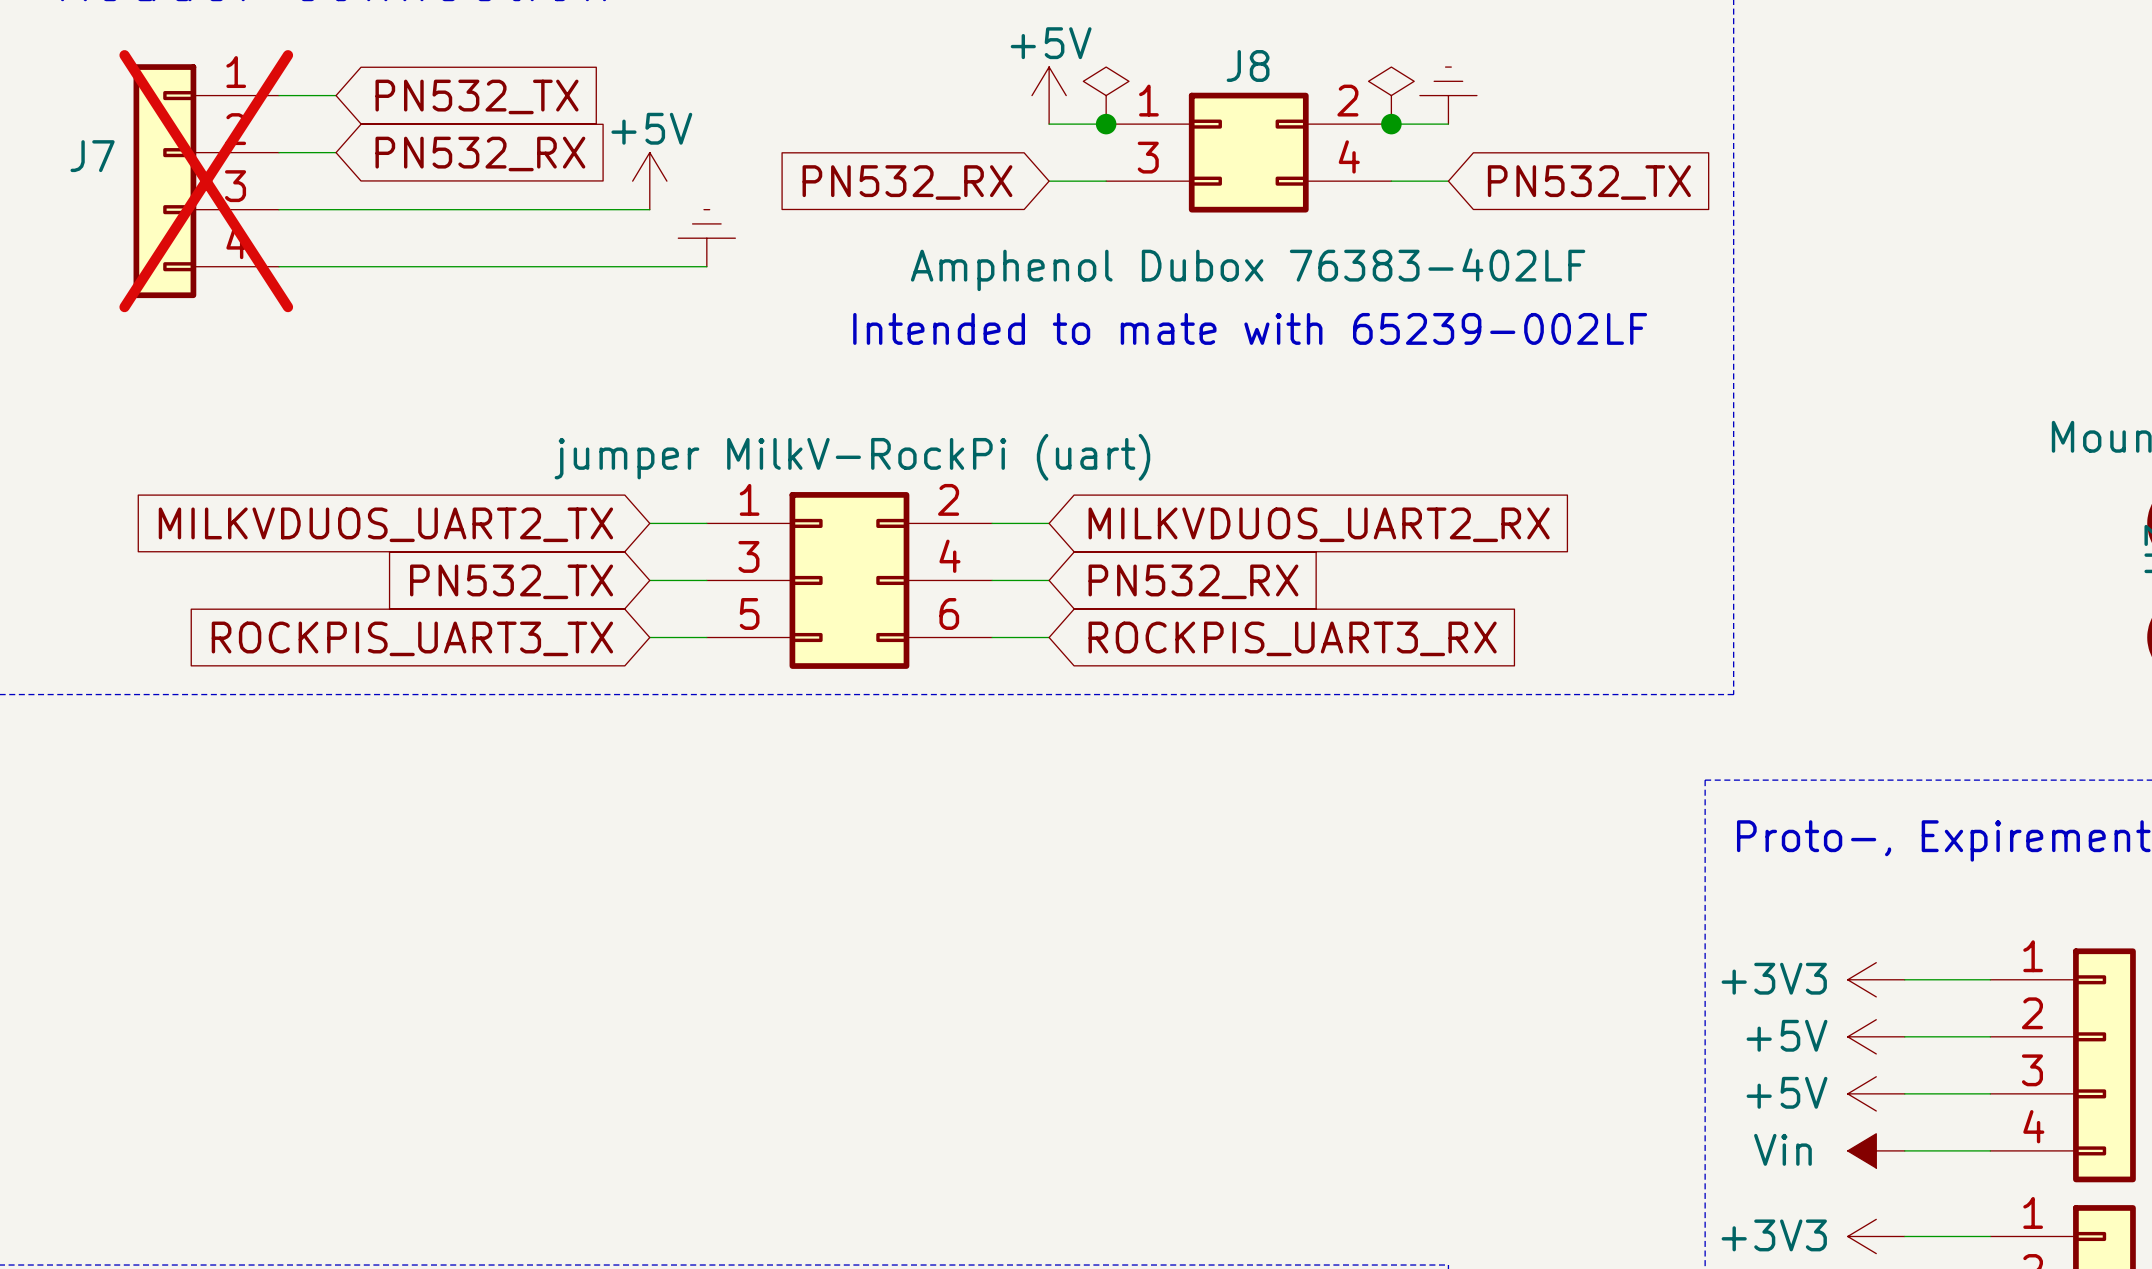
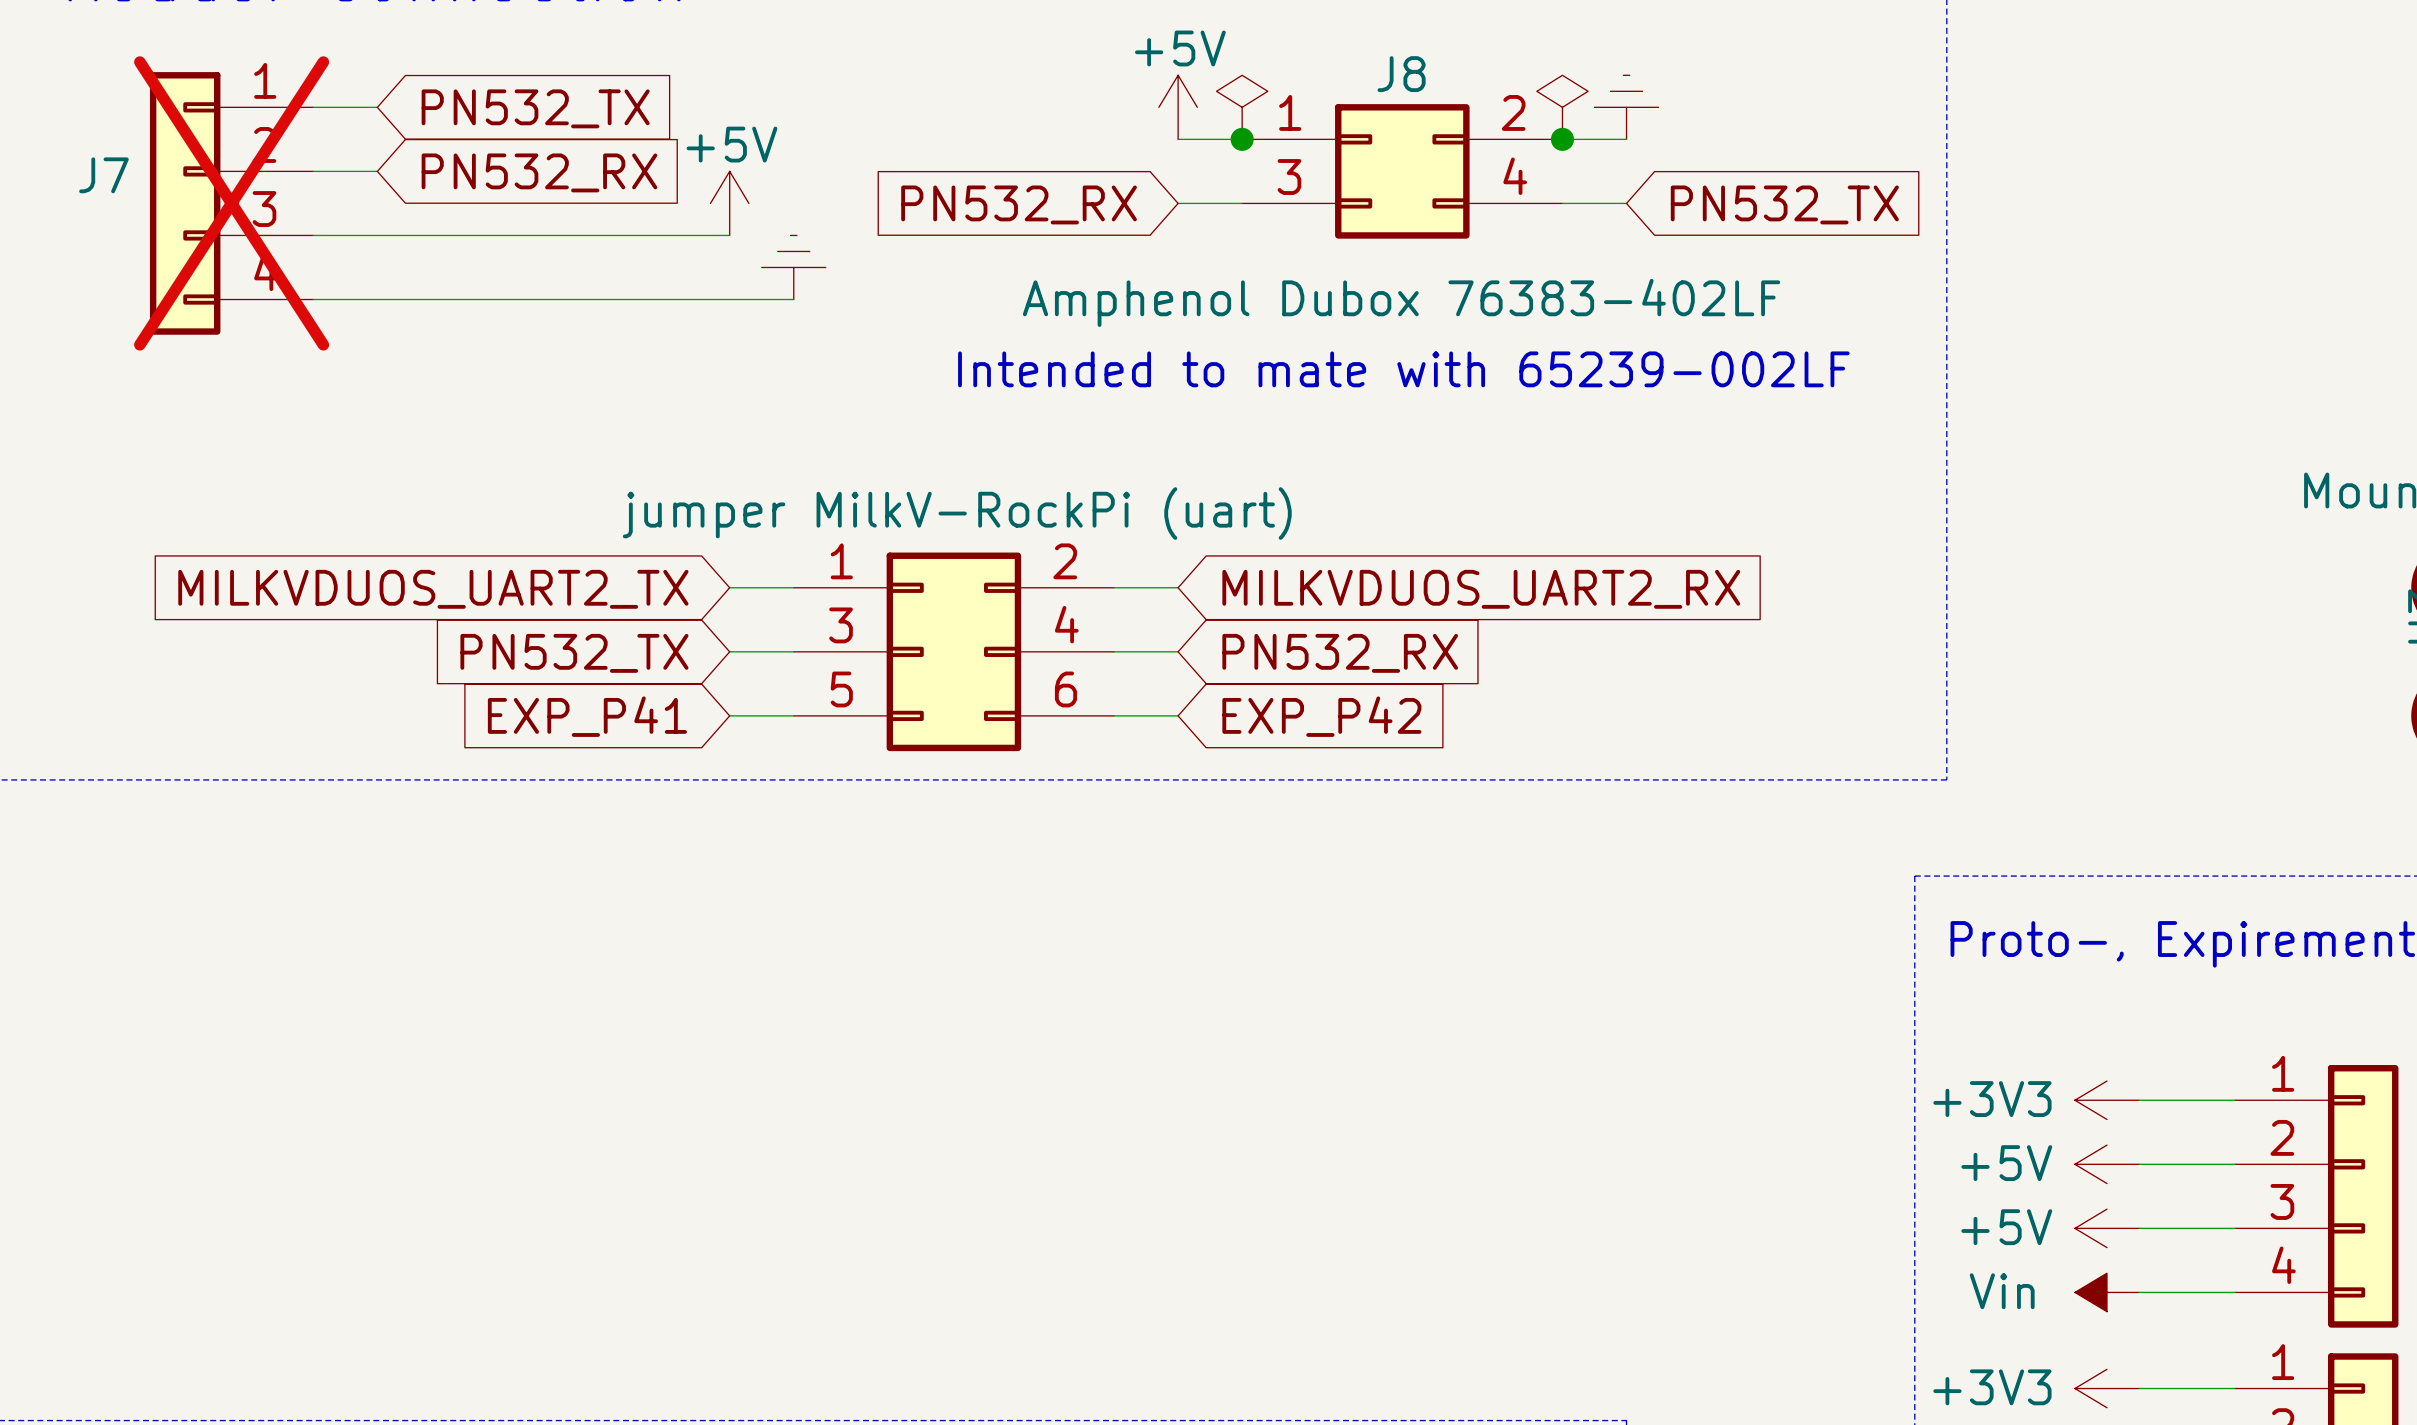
global label: ROCKPIS_UART3_TX (412, 638) -> EXP_P41 (587, 716)
global label: ROCKPIS_UART3_RX (1292, 638) -> EXP_P42 (1321, 716)

